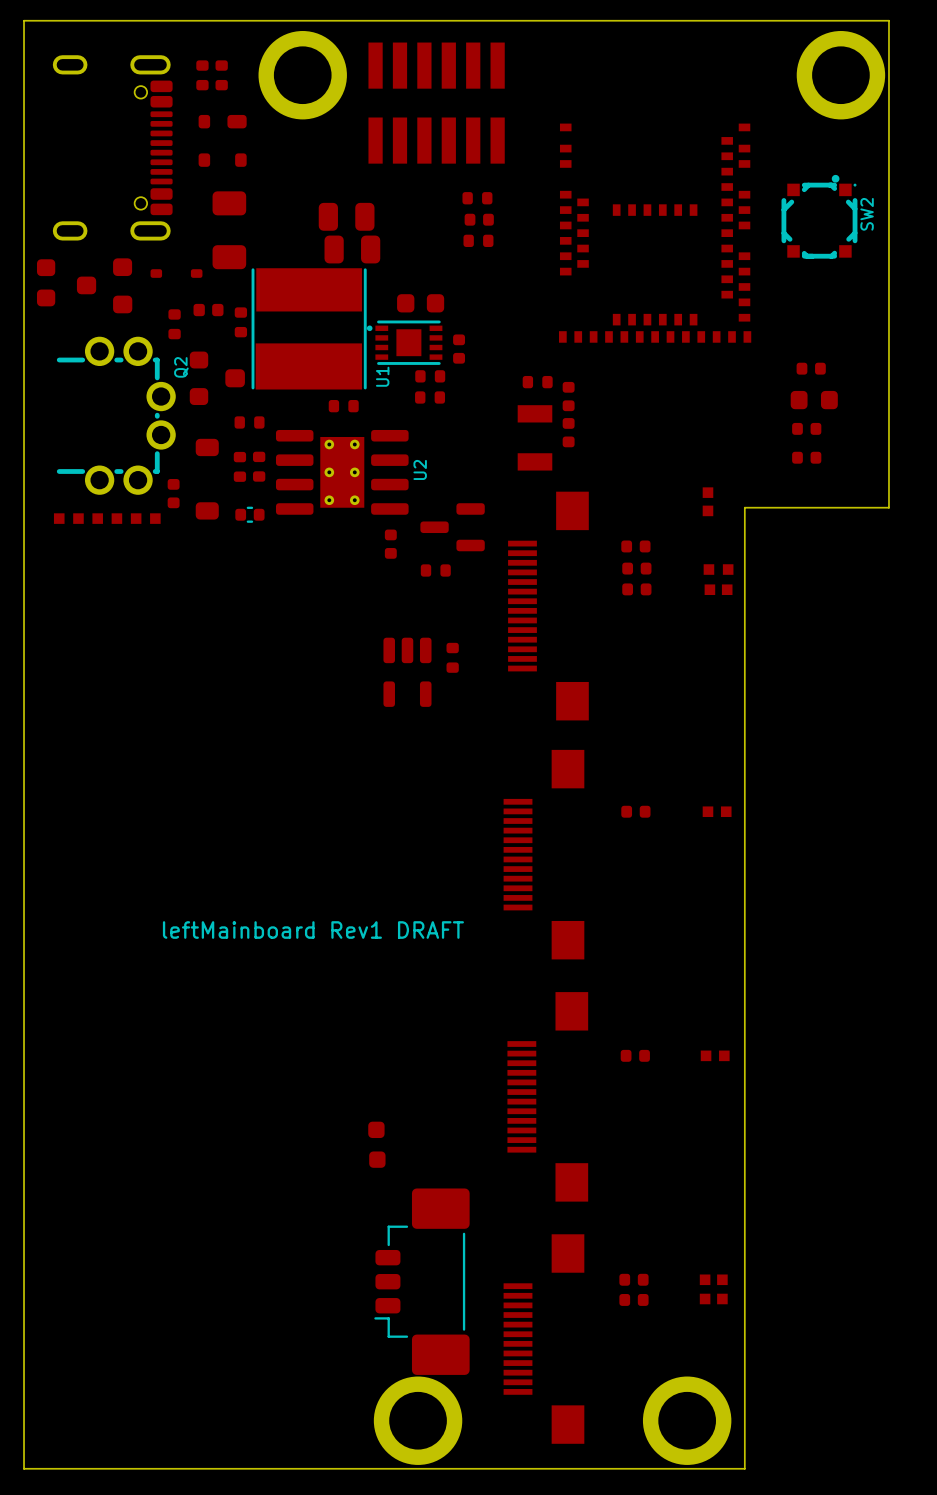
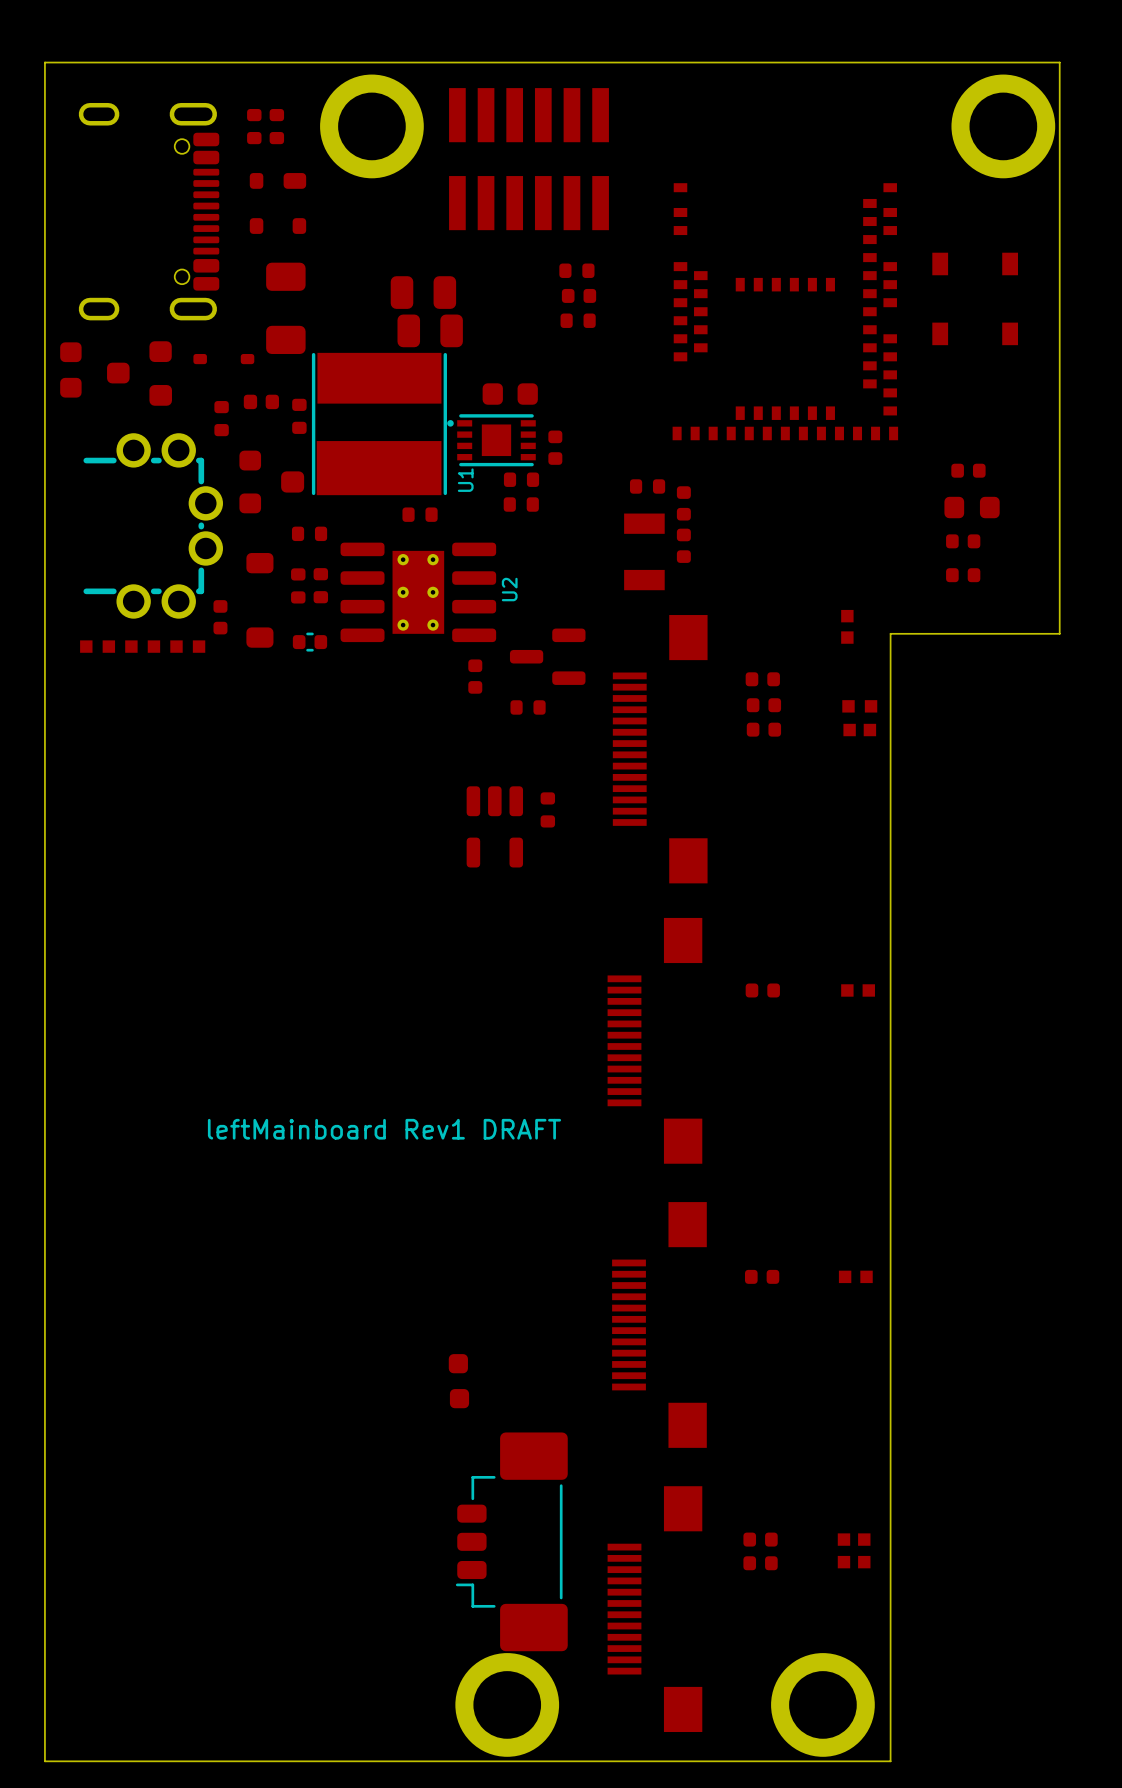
part footprint: [781, 174, 858, 259] -> [932, 252, 1019, 346]
text: SW2 (867, 214) -> none
text: Q2 (181, 367) -> none

